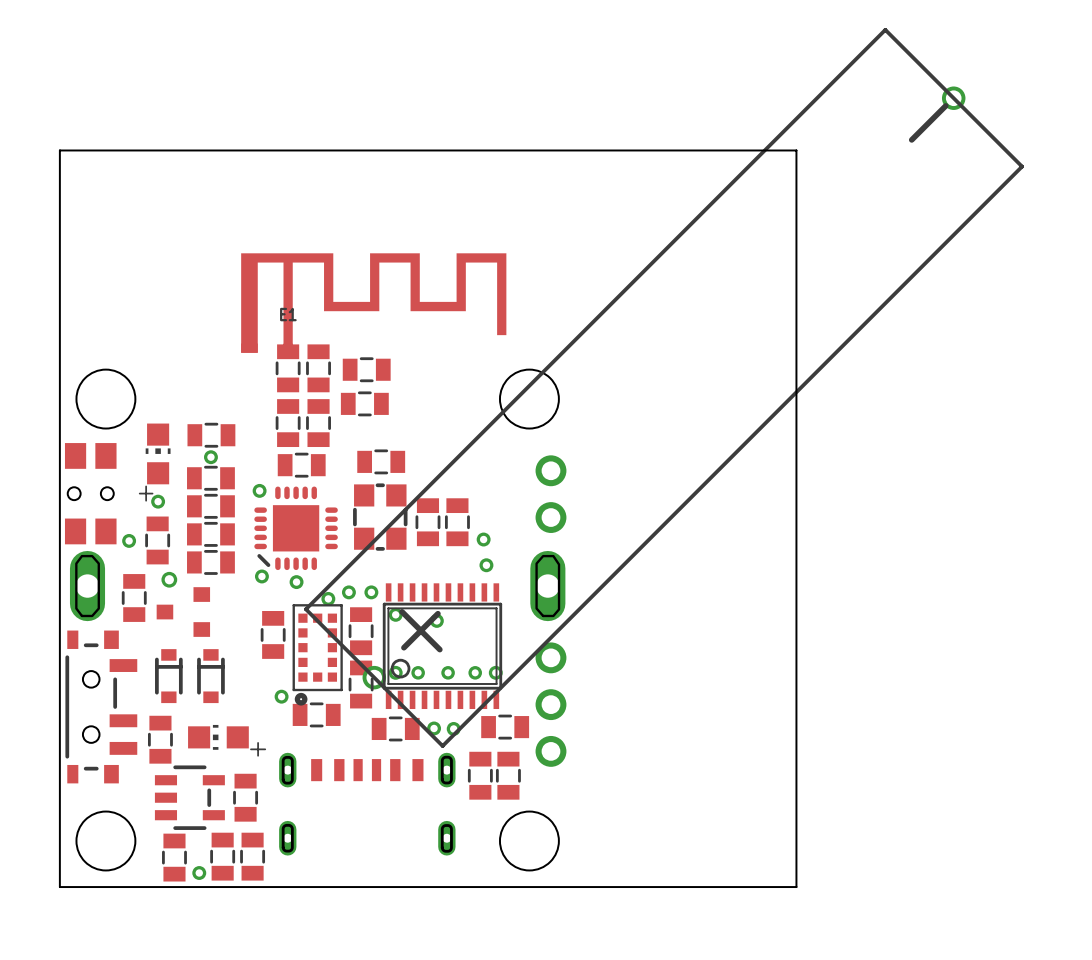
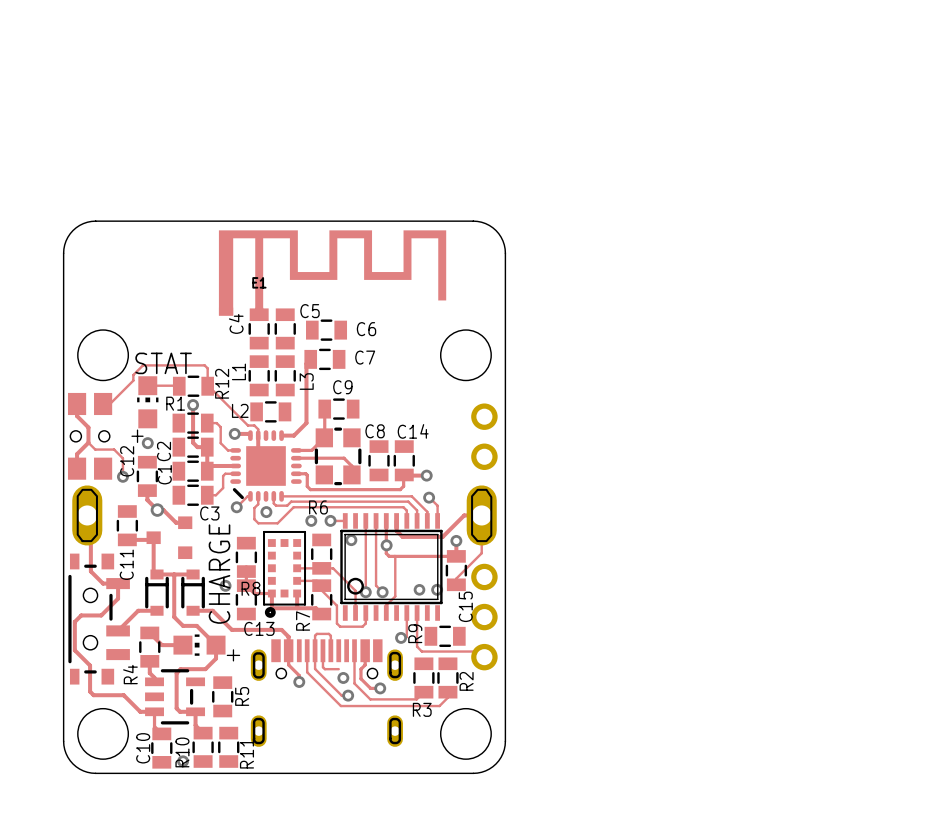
board edge: (59, 279) (59, 150) (796, 150) (796, 887) (538, 887) -> (63, 253) (66, 240) (73, 230) (83, 223) (95, 221) (473, 221) (489, 225) (498, 233) (504, 244) (505, 253) (505, 741) (502, 753) (496, 763) (485, 770) (473, 773)
C5 name: none -> C5 (310, 311)
C4 name: none -> C4 (236, 323)
C6 name: none -> C6 (366, 329)
part: (664, 387) -> none
C7 name: none -> C7 (365, 357)
track: none -> (310, 359) (306, 363) (306, 423) (293, 435) (281, 435)
text: none -> STAT (163, 363)
L1 name: none -> L1 (238, 371)
L3 name: none -> L3 (306, 381)
R12 name: none -> R12 (222, 383)
track: none -> (147, 385) (179, 386)
C9 name: none -> C9 (342, 387)
track: none -> (77, 403) (77, 416) (88, 427) (88, 442)
track: none -> (103, 403) (110, 403) (133, 380) (133, 375) (142, 365) (204, 365) (207, 368) (207, 386) (247, 425) (254, 425) (258, 429) (258, 458)
R1 name: none -> R1 (175, 403)
track: none -> (193, 405) (193, 442) (197, 447) (207, 447) (207, 471) (212, 465) (235, 465)
track: none -> (324, 409) (324, 437) (311, 450) (296, 450)
L2 name: none -> L2 (240, 410)
track: none -> (207, 423) (216, 423) (220, 427) (220, 443) (228, 450) (235, 450)
C8 name: none -> C8 (375, 431)
C14 name: none -> C14 (413, 431)
track: none -> (234, 433) (250, 435)
track: none -> (88, 442) (95, 449) (114, 449) (122, 458) (122, 476)
track: none -> (88, 442) (77, 454) (77, 468)
C2 name: none -> C2 (164, 451)
track: none -> (296, 458) (343, 458) (351, 466) (351, 474)
C12 name: none -> C12 (127, 461)
track: none -> (235, 473) (225, 473) (223, 476) (223, 488) (215, 495) (207, 495)
track: none -> (296, 473) (307, 475) (307, 486) (310, 489) (400, 489) (403, 486) (404, 474) (426, 475)
C1 name: none -> C1 (164, 474)
track: none -> (147, 490) (147, 500) (157, 510) (163, 510) (176, 522) (185, 522)
track: none -> (250, 496) (247, 496) (236, 507)
track: none -> (258, 496) (258, 504) (254, 508) (254, 519) (258, 523) (277, 523) (293, 507) (403, 507) (406, 510) (406, 520)
track: none -> (273, 496) (273, 503) (276, 505) (287, 505) (291, 501) (408, 501) (417, 510) (417, 520)
track: none -> (281, 496) (411, 496) (427, 511) (427, 520)
track: none -> (429, 497) (437, 505) (437, 520)
R6 name: none -> R6 (318, 507)
C3 name: none -> C3 (209, 513)
track: none -> (87, 515) (90, 519) (90, 571) (103, 583) (118, 583) (118, 598) (101, 615) (81, 615) (74, 621) (74, 650) (90, 665) (90, 691) (93, 695) (123, 695) (140, 711) (154, 711) (154, 726) (161, 733)
track: none -> (330, 520) (345, 520)
track: none -> (365, 520) (365, 592)
track: none -> (376, 520) (376, 585) (382, 592)
track: none -> (386, 520) (386, 553) (389, 556) (456, 556) (456, 540)
track: none -> (396, 520) (396, 530) (402, 536) (442, 536) (464, 515) (481, 515) (481, 553) (456, 578) (456, 584)
via: (328, 598) -> none
track: none -> (127, 539) (151, 539) (153, 537) (153, 571) (157, 574) (193, 574)
via: none -> (456, 540)
track: none -> (394, 556) (395, 596) (386, 605) (386, 613)
C11 name: none -> C11 (126, 564)
track: none -> (246, 566) (246, 585) (254, 593) (271, 593) (271, 608) (315, 608) (321, 614)
track: none -> (297, 568) (333, 568) (355, 590) (355, 613)
C15: none -> (456, 570)
track: none -> (174, 574) (174, 617) (183, 625) (196, 625) (216, 645) (216, 658) (205, 669) (180, 669) (176, 673) (176, 708) (180, 711) (195, 711) (195, 725) (203, 733)
text: none -> CHARGE (219, 574)
track: none -> (297, 580) (316, 580) (321, 585) (321, 590) (336, 605) (336, 623) (340, 626) (362, 626) (365, 623) (365, 613)
R8 name: none -> R8 (250, 588)
via position: (395, 672) -> (365, 592)
via: (418, 672) -> none
via: (448, 672) -> none
via: none -> (382, 592)
track: none -> (297, 593) (297, 608)
C13: none -> (246, 599)
via position: (281, 696) -> (225, 585)
track: none -> (157, 610) (138, 610) (118, 630)
track: none -> (193, 610) (212, 610) (231, 629) (281, 629) (288, 636) (288, 664) (299, 675) (299, 681)
track: none -> (406, 613) (405, 637)
track: none -> (417, 613) (417, 646) (421, 651) (478, 651) (484, 657)
R7 name: none -> R7 (303, 621)
part: (316, 714) -> none
track: none -> (149, 632) (161, 645) (182, 645)
R9 name: none -> R9 (415, 633)
part: (395, 728) -> none
via: (434, 728) -> none
track: none -> (307, 650) (307, 672) (340, 706) (439, 706) (447, 697) (447, 692)
track: none -> (322, 650) (322, 667) (324, 669) (338, 669)
track: none -> (330, 650) (330, 635) (328, 633) (316, 633) (315, 635) (315, 668) (341, 695) (348, 695)
track: none -> (354, 650) (354, 683) (370, 699) (416, 699) (423, 692)
track: none -> (365, 650) (365, 664) (360, 669) (360, 678) (370, 688) (380, 688)
part footprint: [279, 752, 456, 856] -> [250, 639, 403, 747]
track: none -> (149, 661) (149, 673) (154, 677) (154, 681)
R4 name: none -> R4 (130, 674)
via: none -> (343, 677)
R2 name: none -> R2 (466, 681)
via: none -> (299, 681)
via: none -> (380, 688)
via: none -> (348, 695)
R5 name: none -> R5 (242, 696)
R3 name: none -> R3 (422, 709)
board edge: (59, 849) (59, 887) (97, 887) -> (63, 741) (66, 753) (73, 763) (83, 770) (95, 773)
C10 name: none -> C10 (143, 748)
R10 name: none -> R10 (182, 752)
R11 name: none -> R11 (246, 753)

